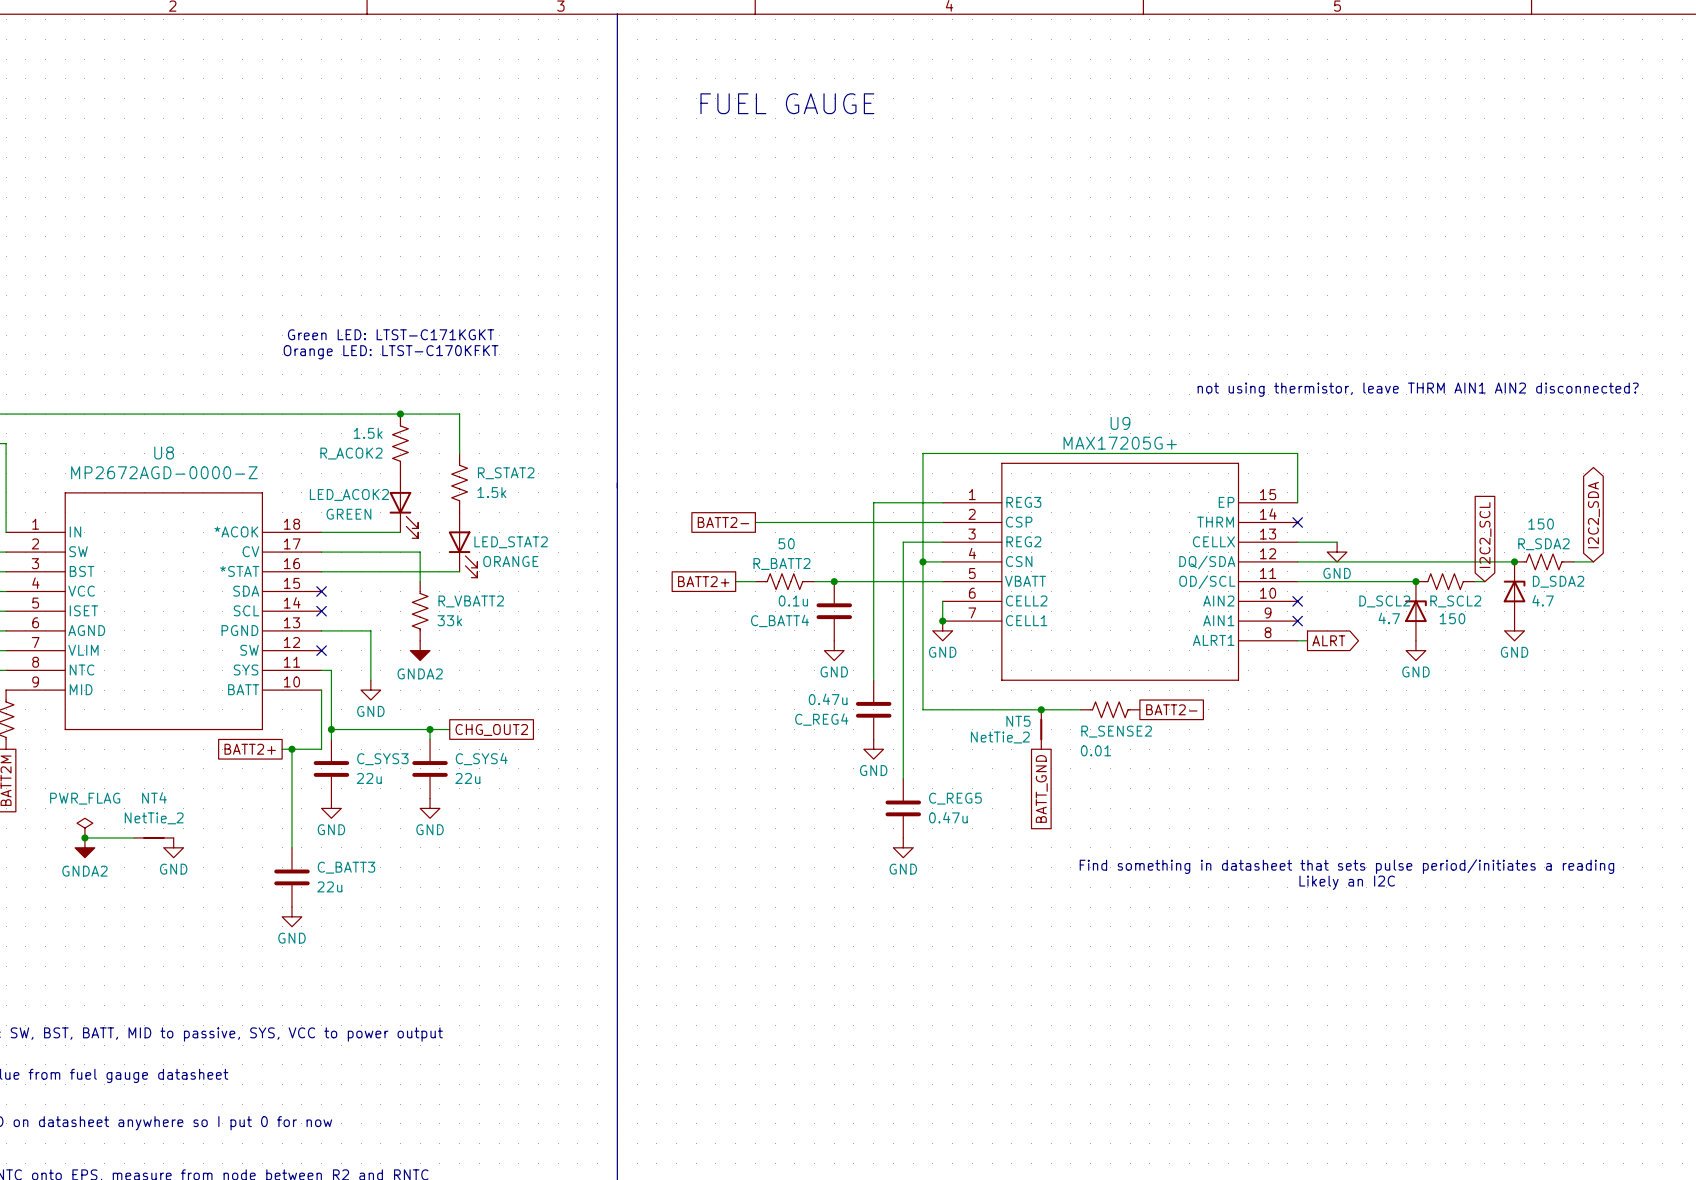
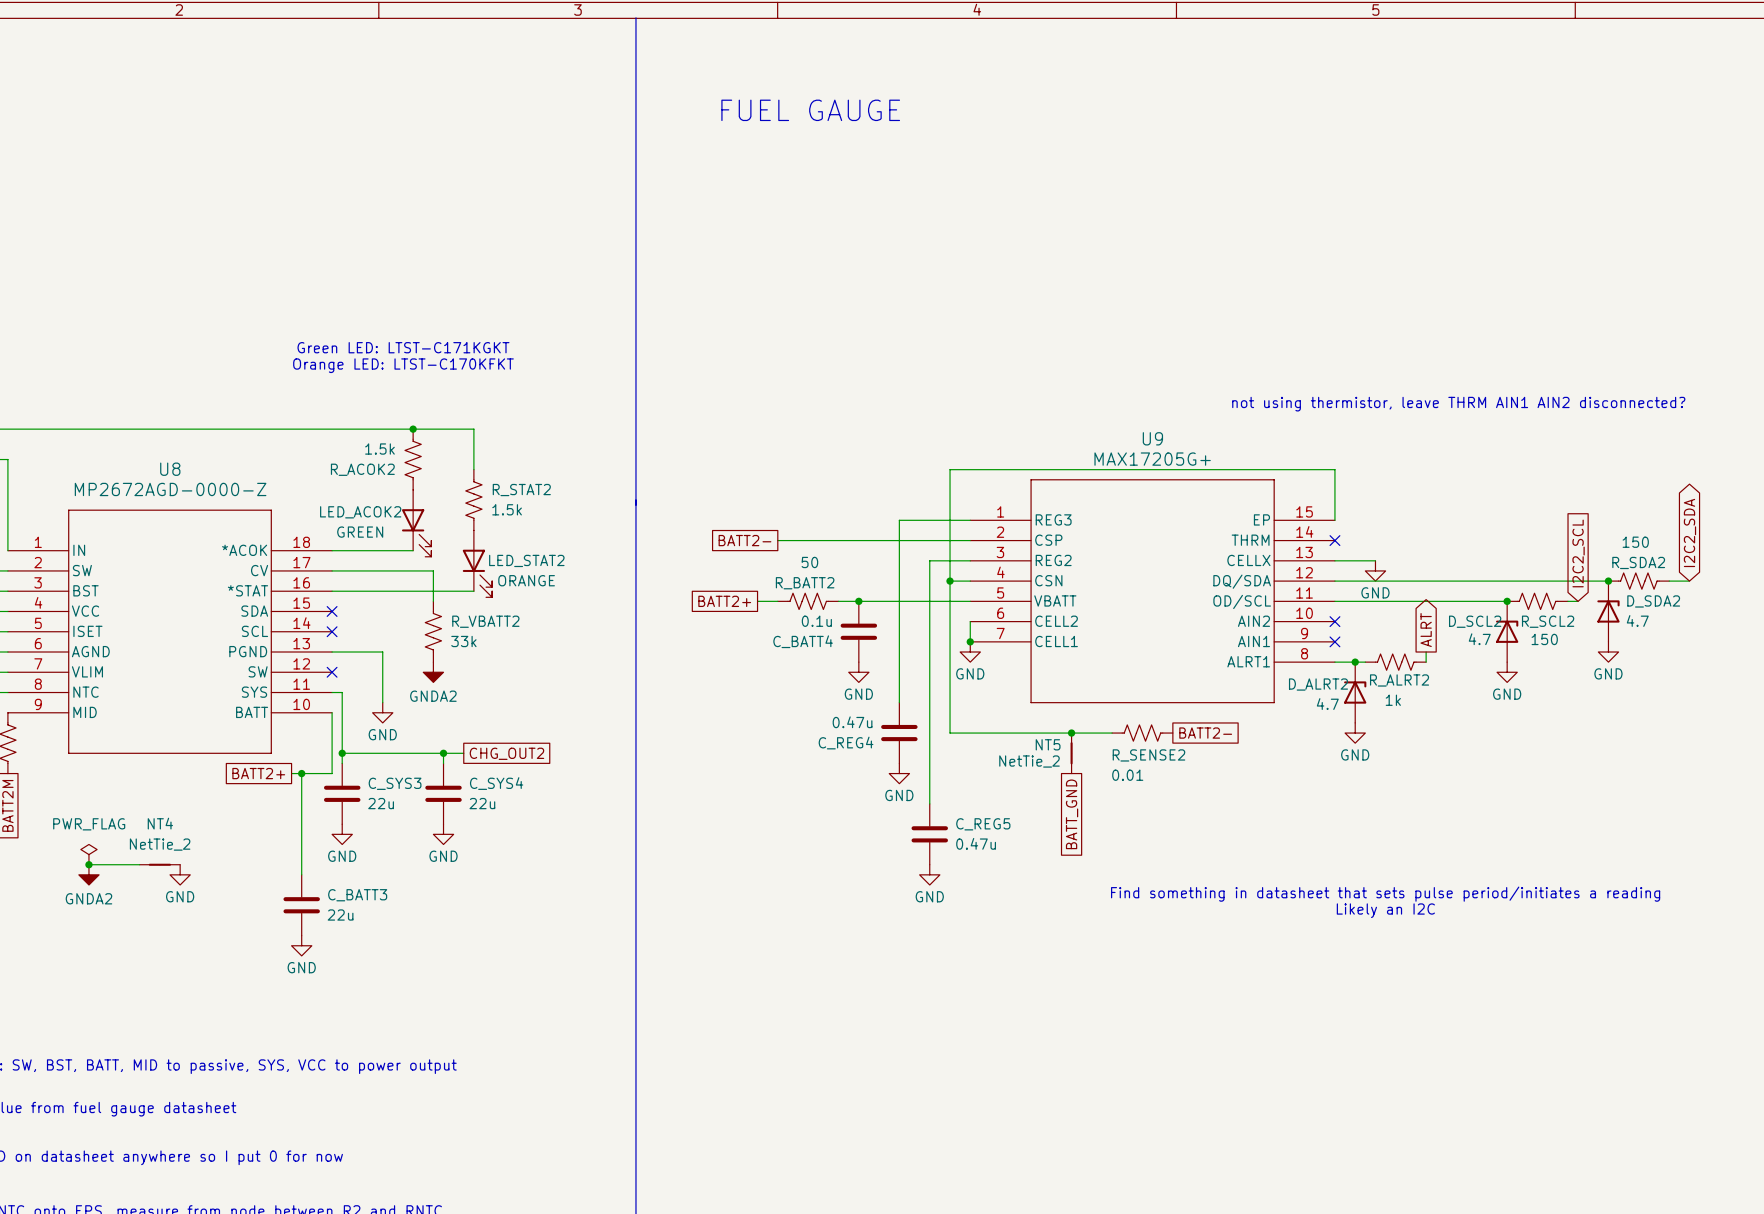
global label position: I2C2_SDA (1593, 515) -> I2C2_SDA (1689, 532)
global label position: I2C2_SCL (1485, 535) -> I2C2_SCL (1578, 553)
wire: none -> (1557, 581) (1608, 581)
junction: (1514, 561) -> none
R_SDA2 position: (1544, 561) -> (1638, 581)
junction: none -> (1608, 581)
wire: (1573, 561) (1593, 561) -> (1669, 581) (1689, 581)
wire: none -> (1456, 601) (1507, 601)
junction: (1415, 581) -> none
R_SCL2 position: (1445, 581) -> (1537, 601)
junction: none -> (1507, 601)
wire: (1475, 581) (1484, 581) -> (1567, 601) (1578, 601)
D_SDA2 position: (1514, 591) -> (1608, 611)
D_SCL2 position: (1415, 611) -> (1507, 631)
wire: none -> (1426, 652) (1426, 662)
power symbol: GND (1514, 630) -> none
power symbol: none -> GND (1608, 652)
wire: none -> (1345, 662) (1365, 662)
junction: none -> (1355, 662)
global label rotation: 0° (1328, 640) -> 90° counterclockwise (1426, 630)
R_ALRT2: none -> 1k (1395, 662)
power symbol: GND (1415, 650) -> none
power symbol: none -> GND (1507, 672)
D_ALRT2: none -> 4.7 (1355, 692)
power symbol: none -> GND (1355, 733)

